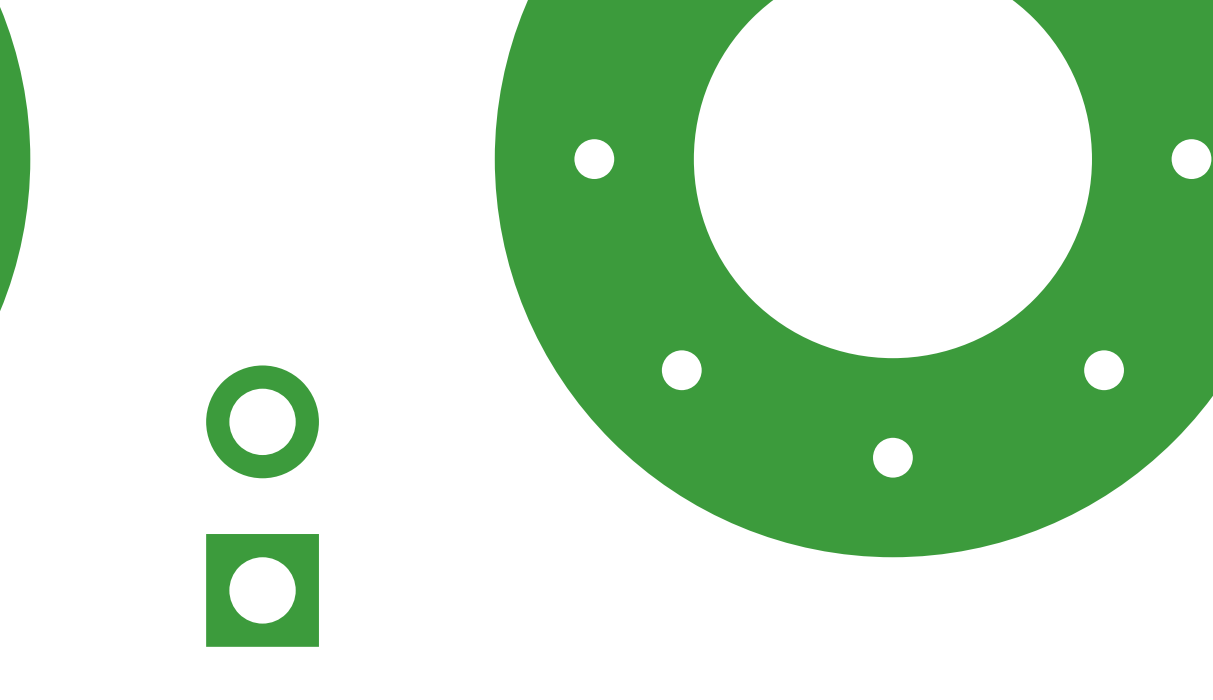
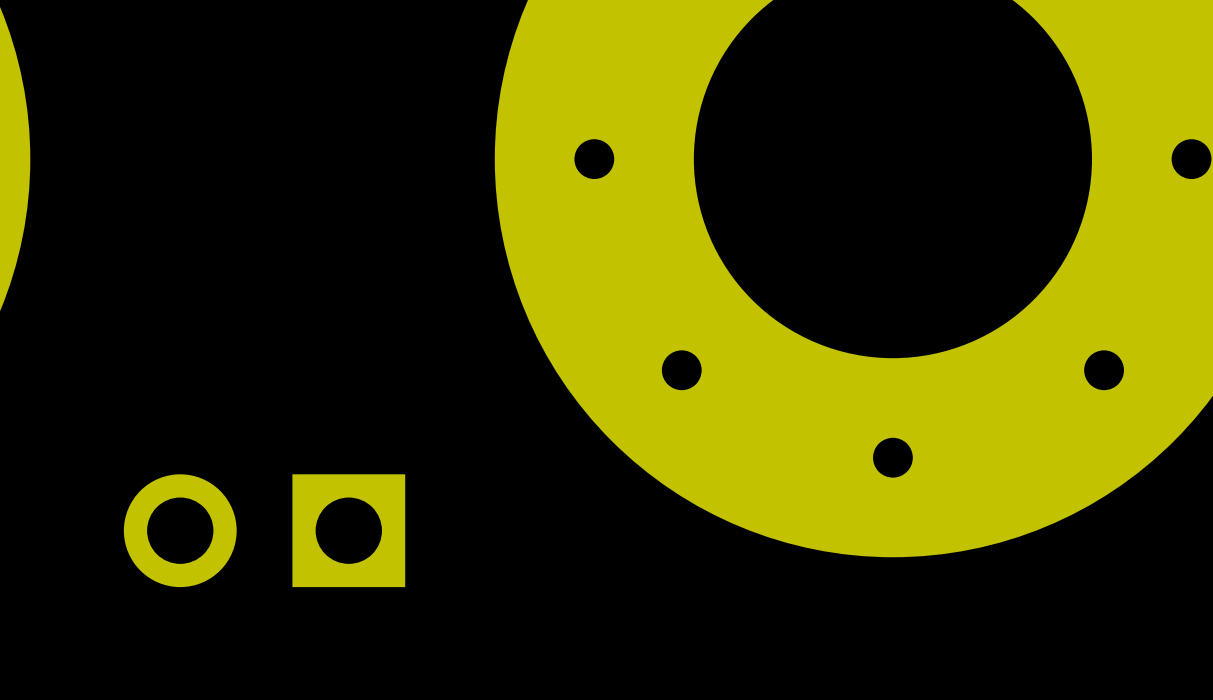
part rotation: 0° (262, 506) -> 90° counterclockwise (264, 530)

